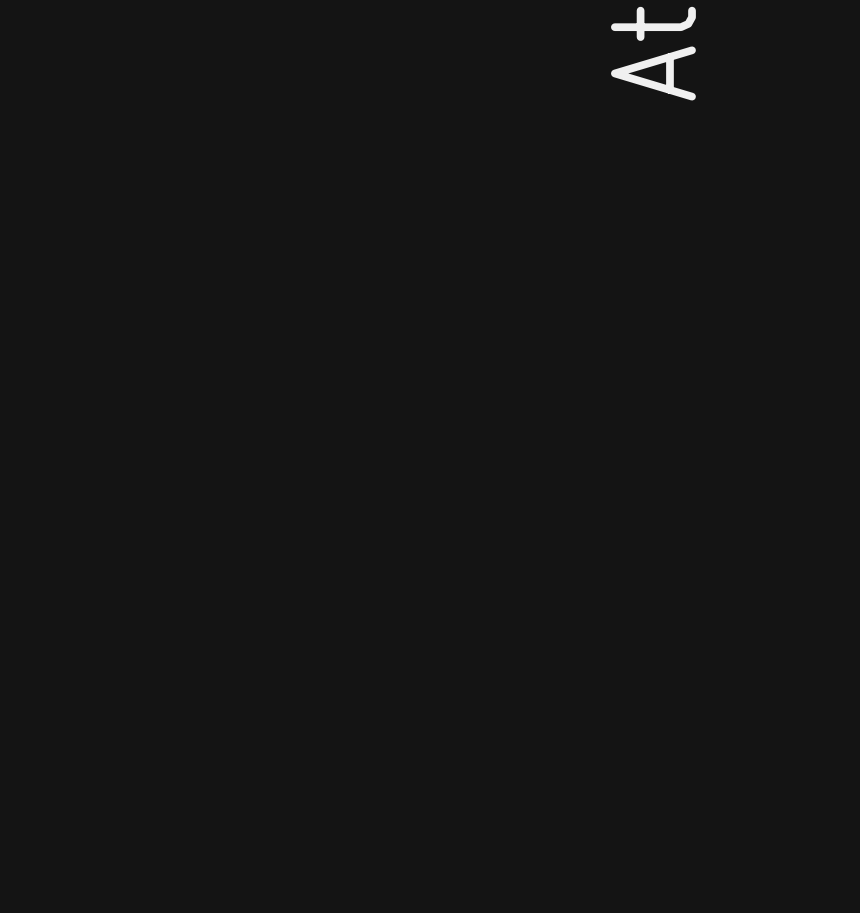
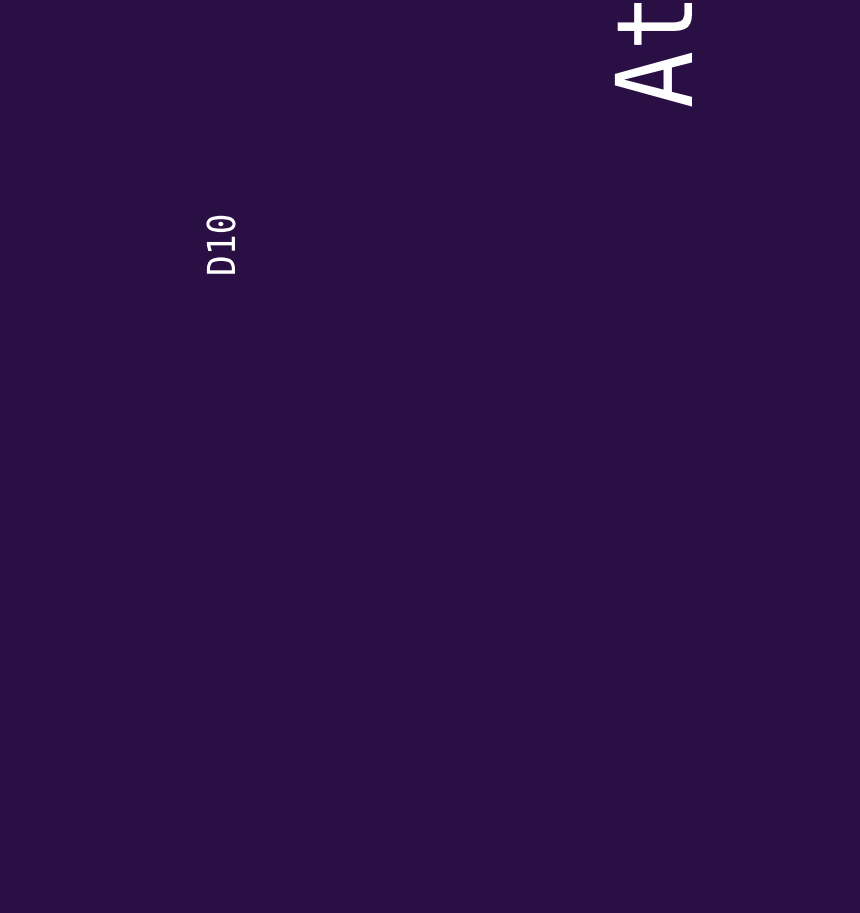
text: none -> D10 (220, 244)

